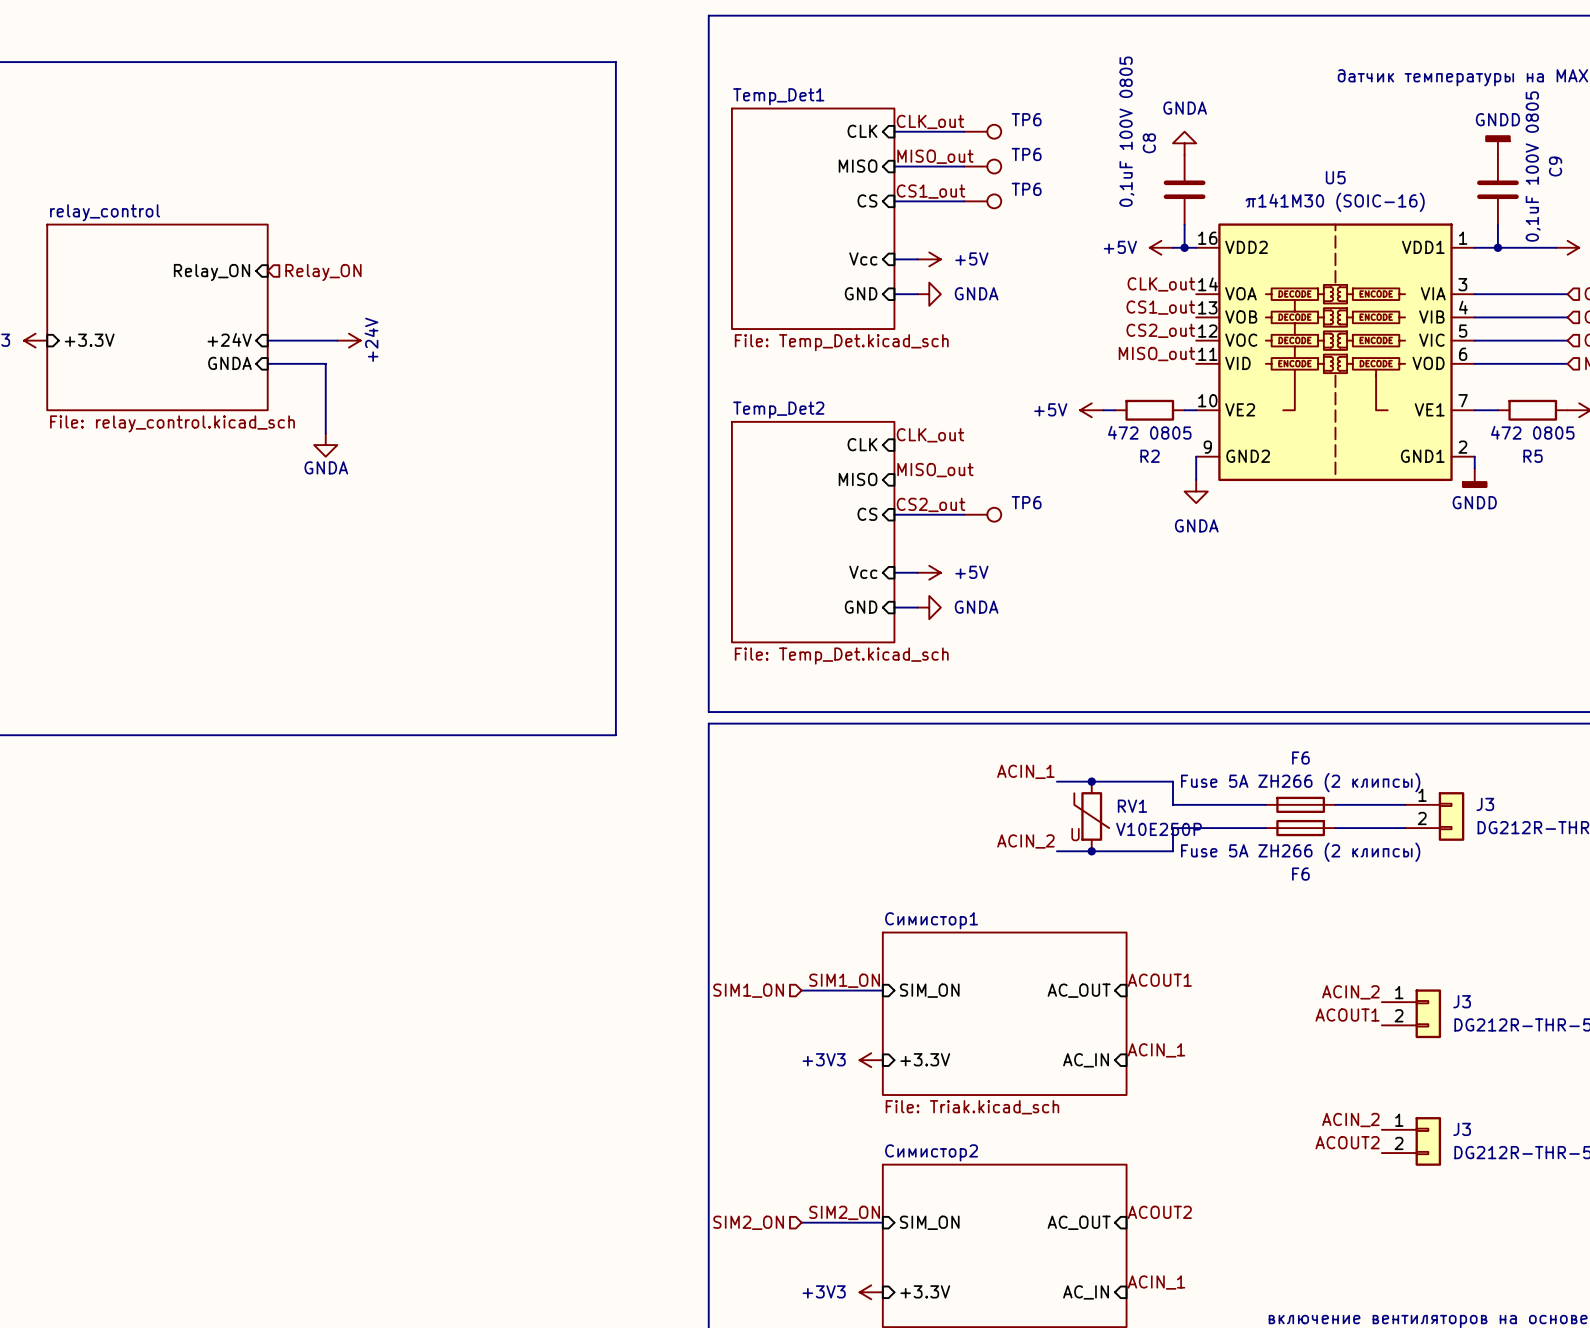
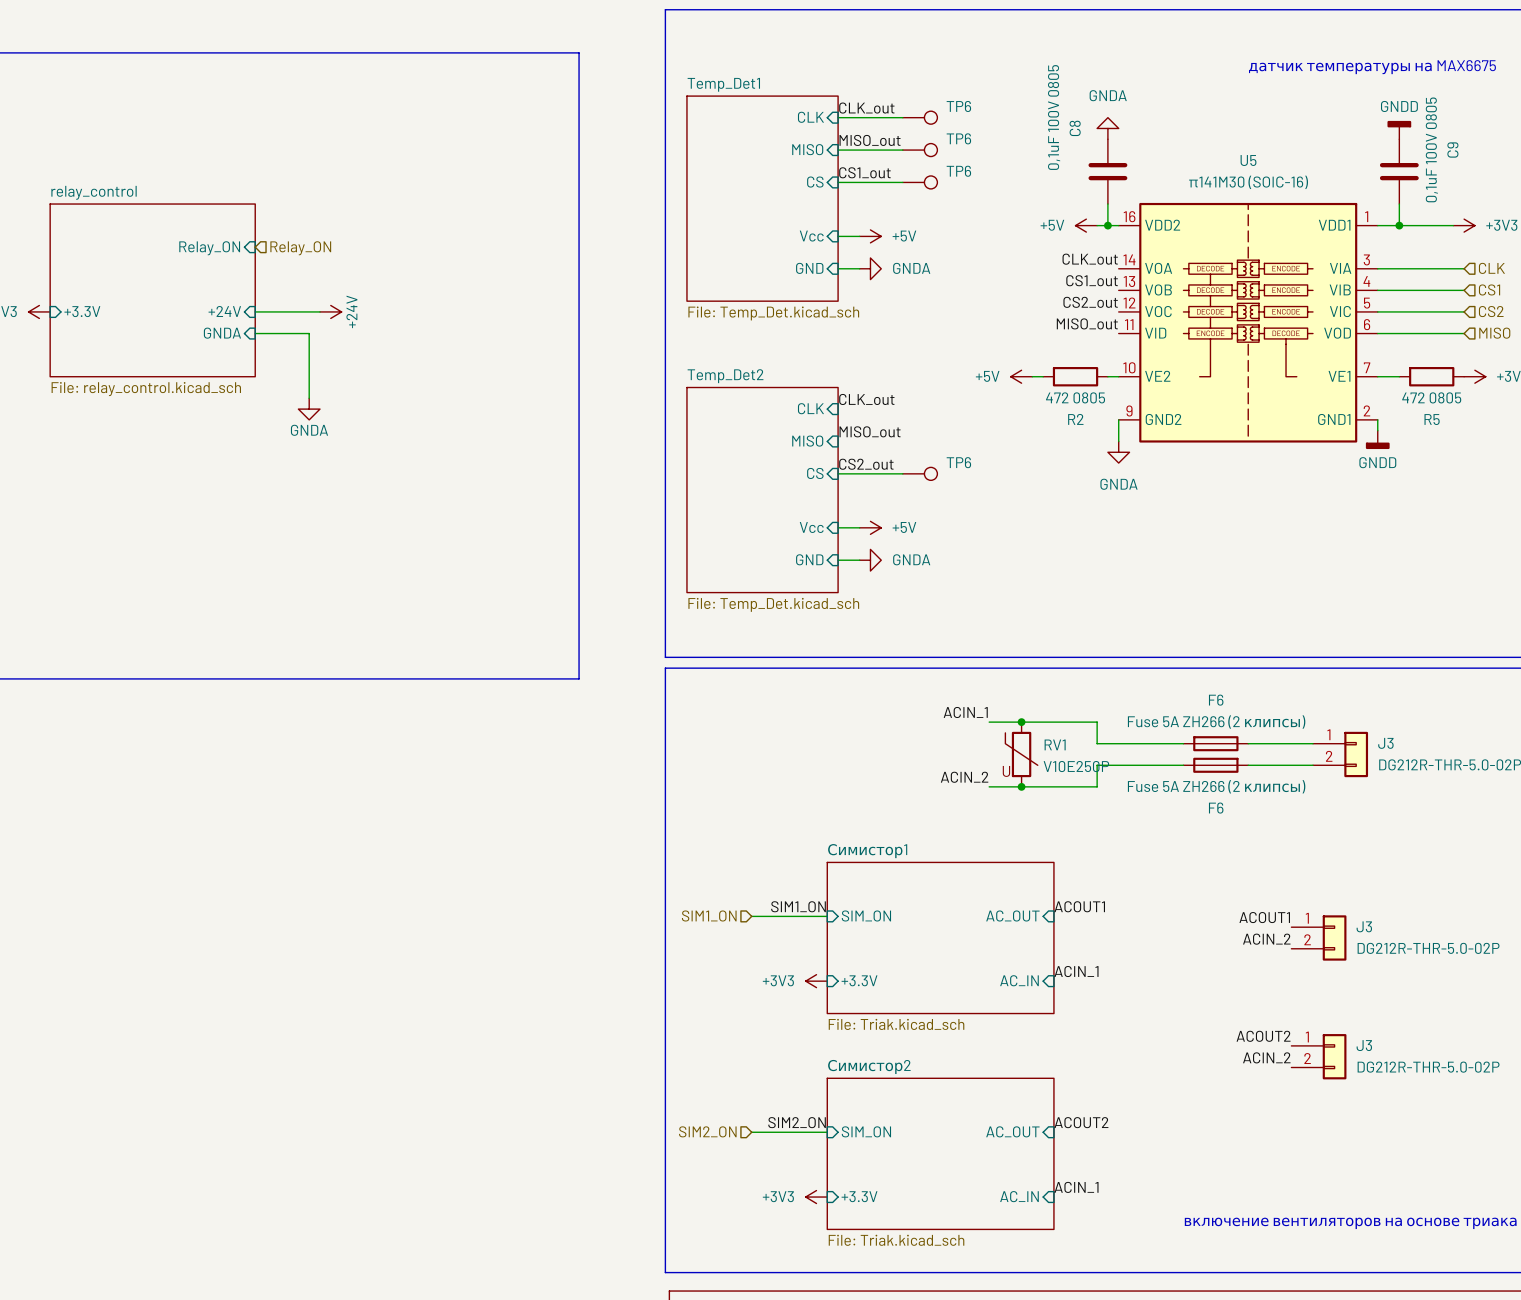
label: ACIN_2 (1350, 992) -> ACOUT1 (1264, 917)
label: ACOUT1 (1347, 1015) -> ACIN_2 (1266, 939)
label: ACIN_2 (1350, 1120) -> ACOUT2 (1263, 1036)
label: ACOUT2 (1347, 1142) -> ACIN_2 (1266, 1057)

